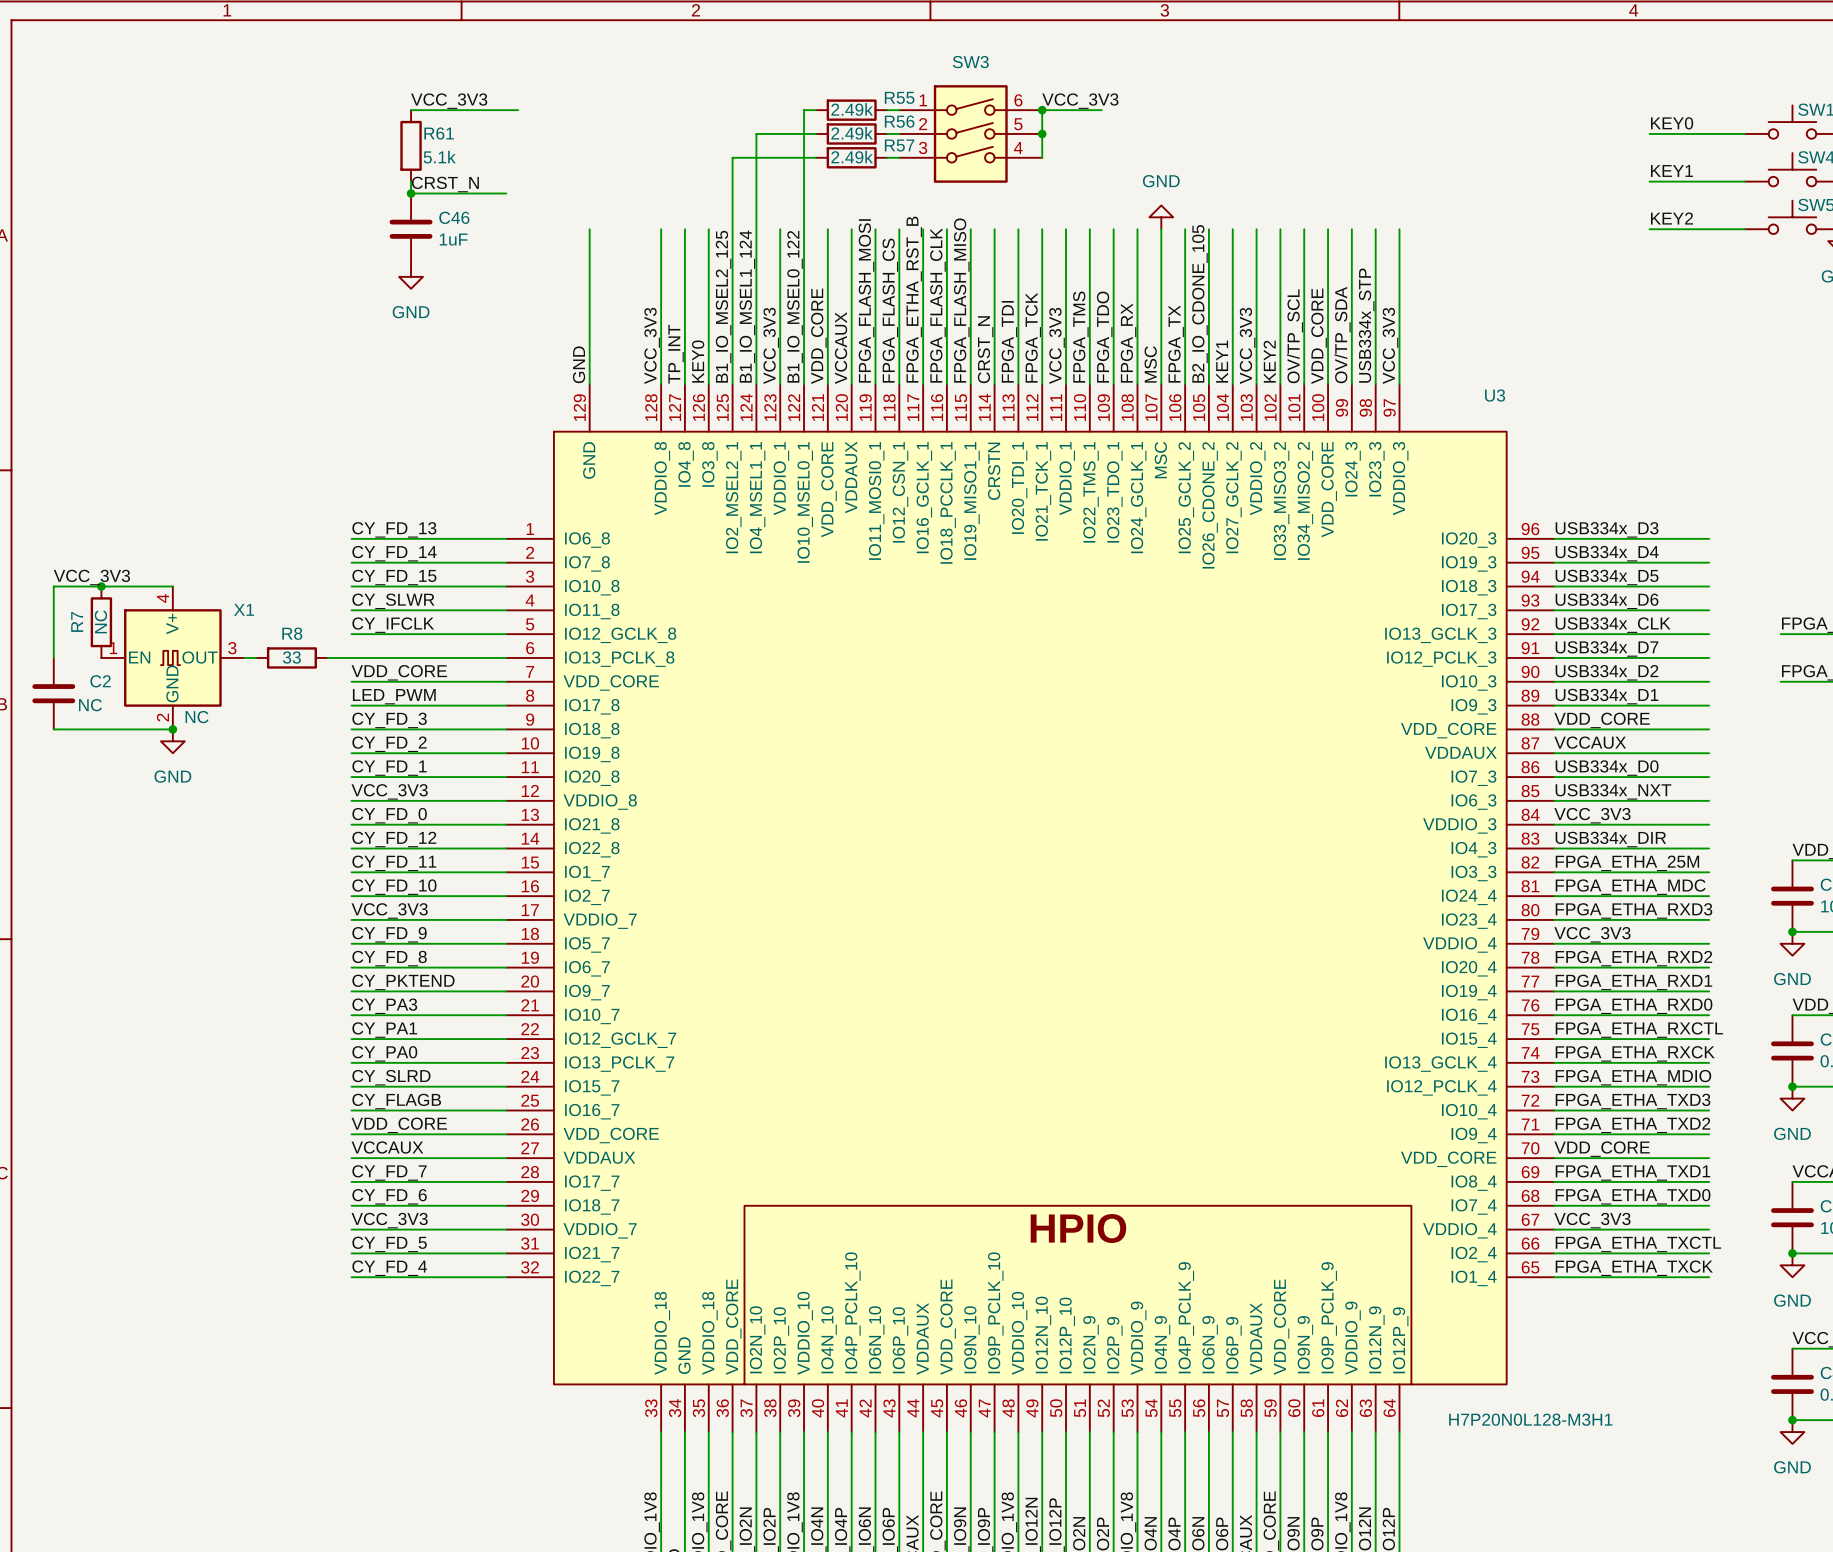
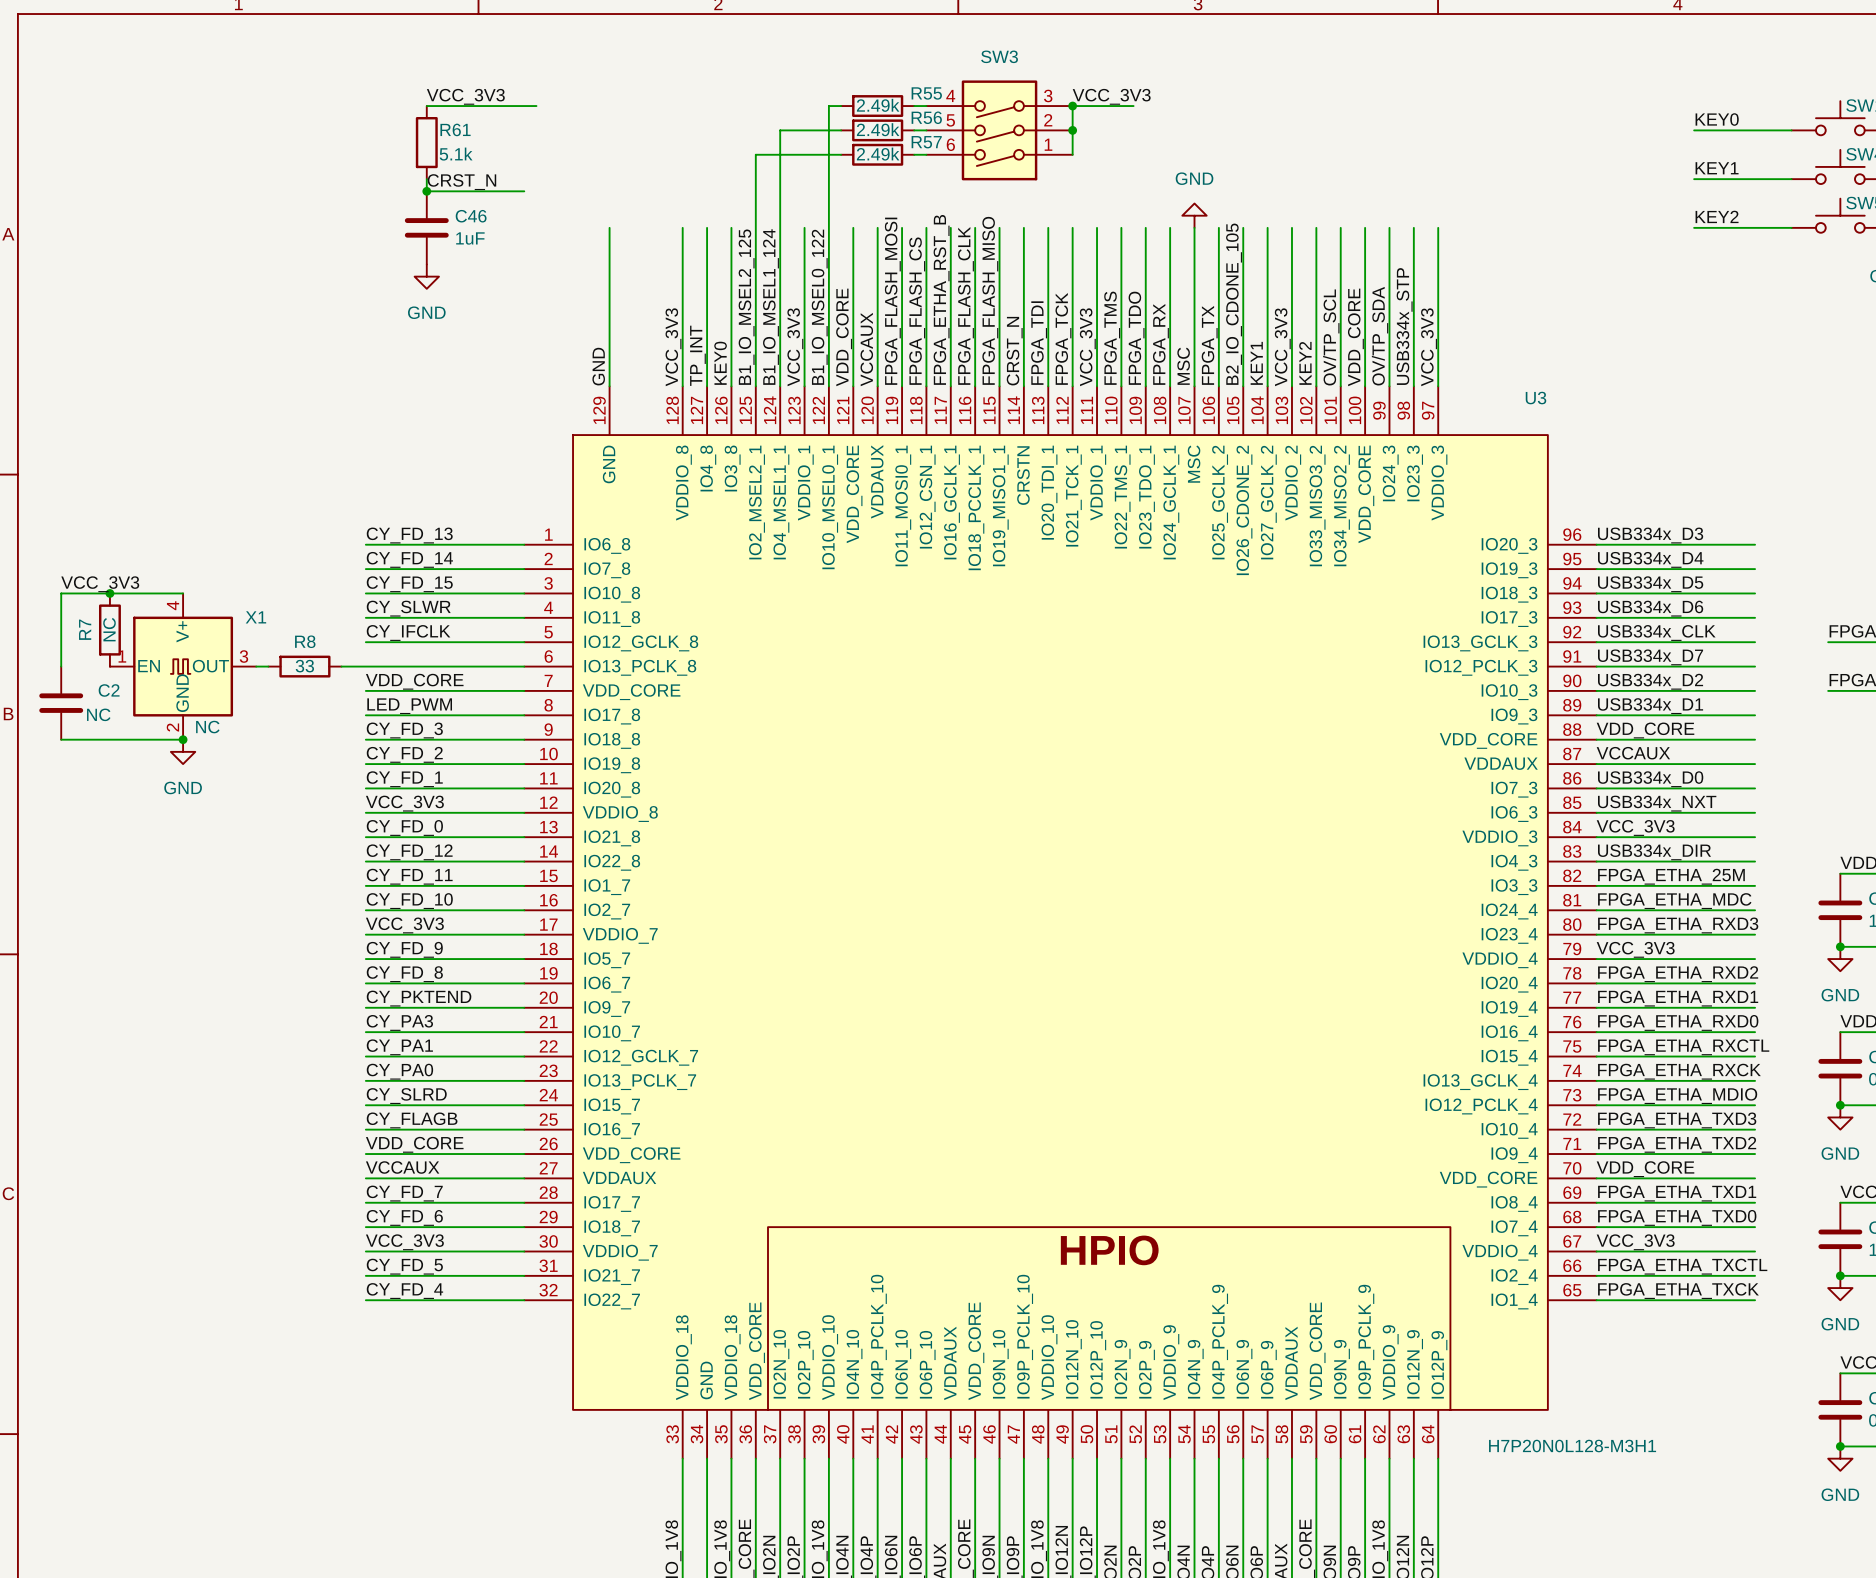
SW3 rotation: 0° (970, 133) -> 180° (999, 130)

